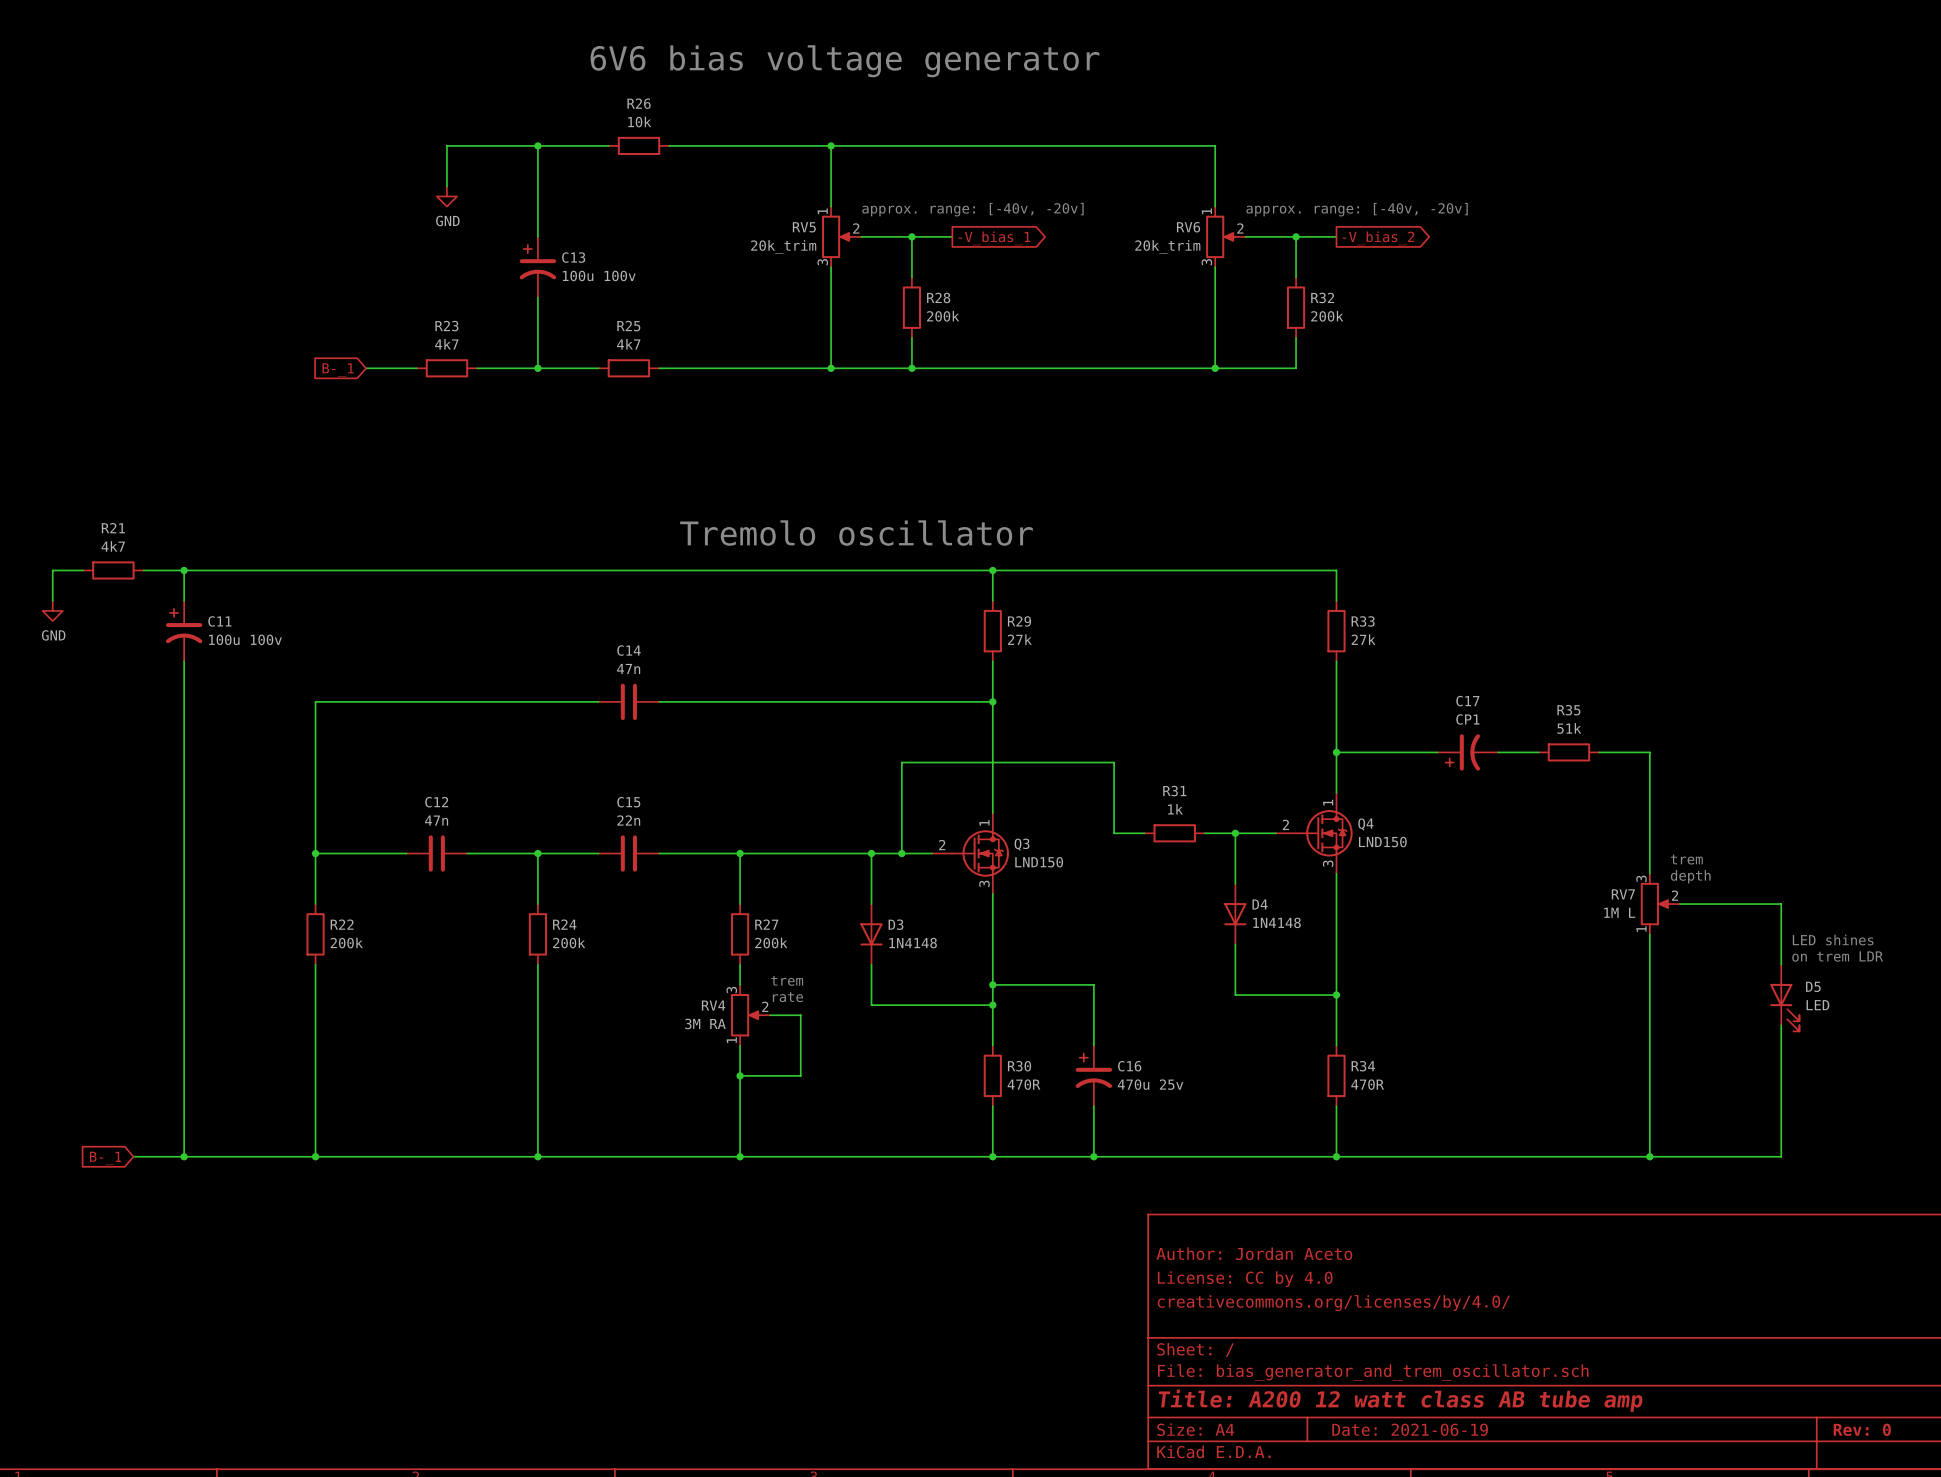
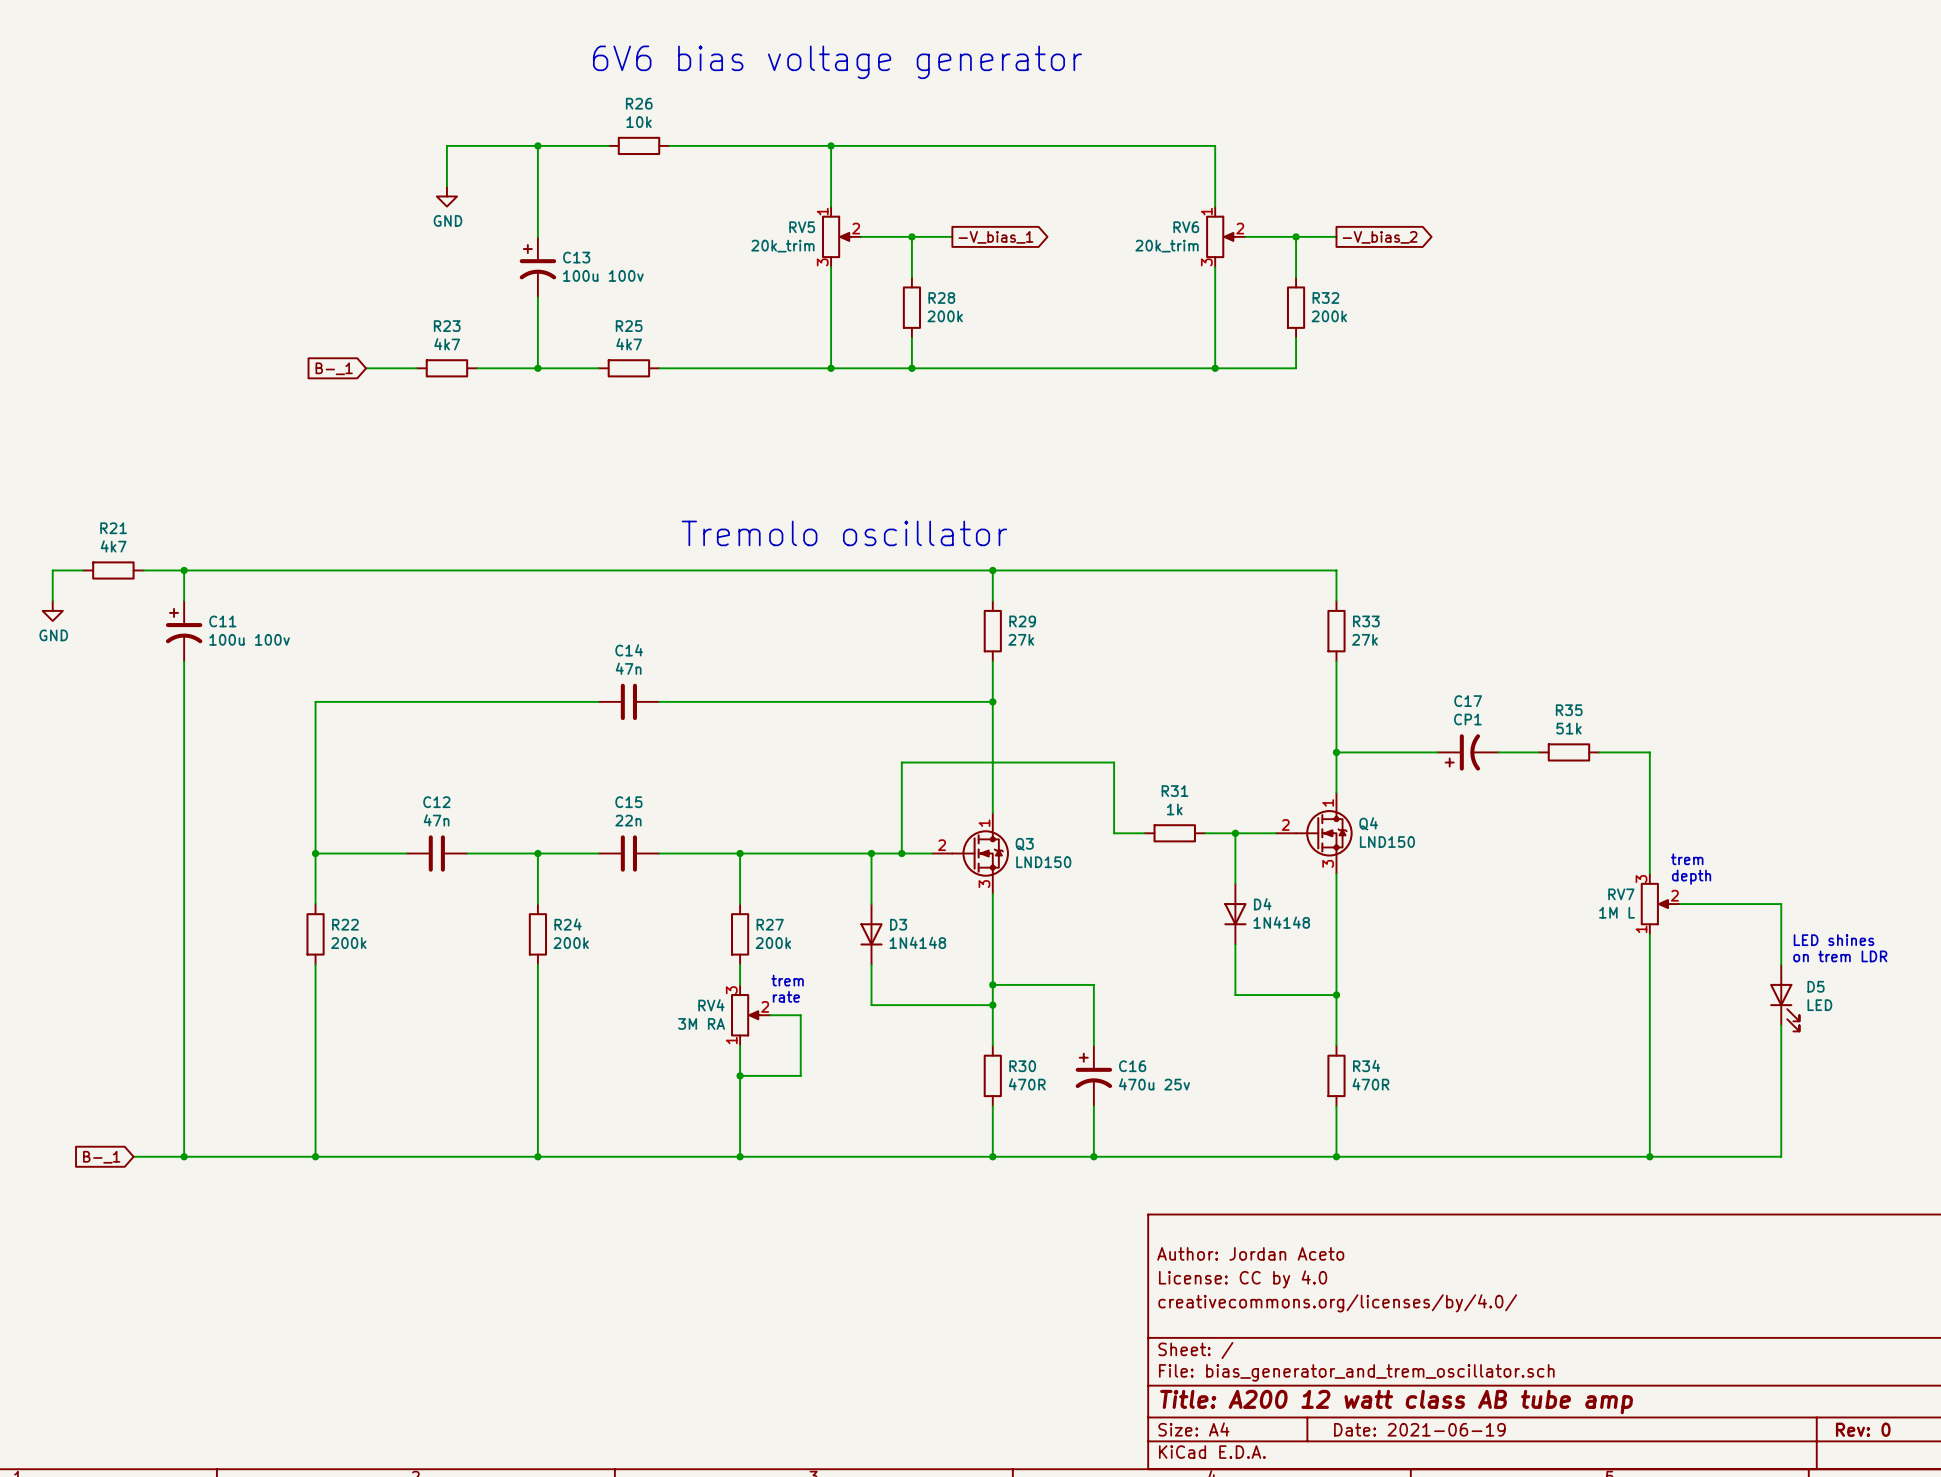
text: approx. range: [-40v, -20v] (972, 209) -> none
text: approx. range: [-40v, -20v] (1357, 209) -> none

